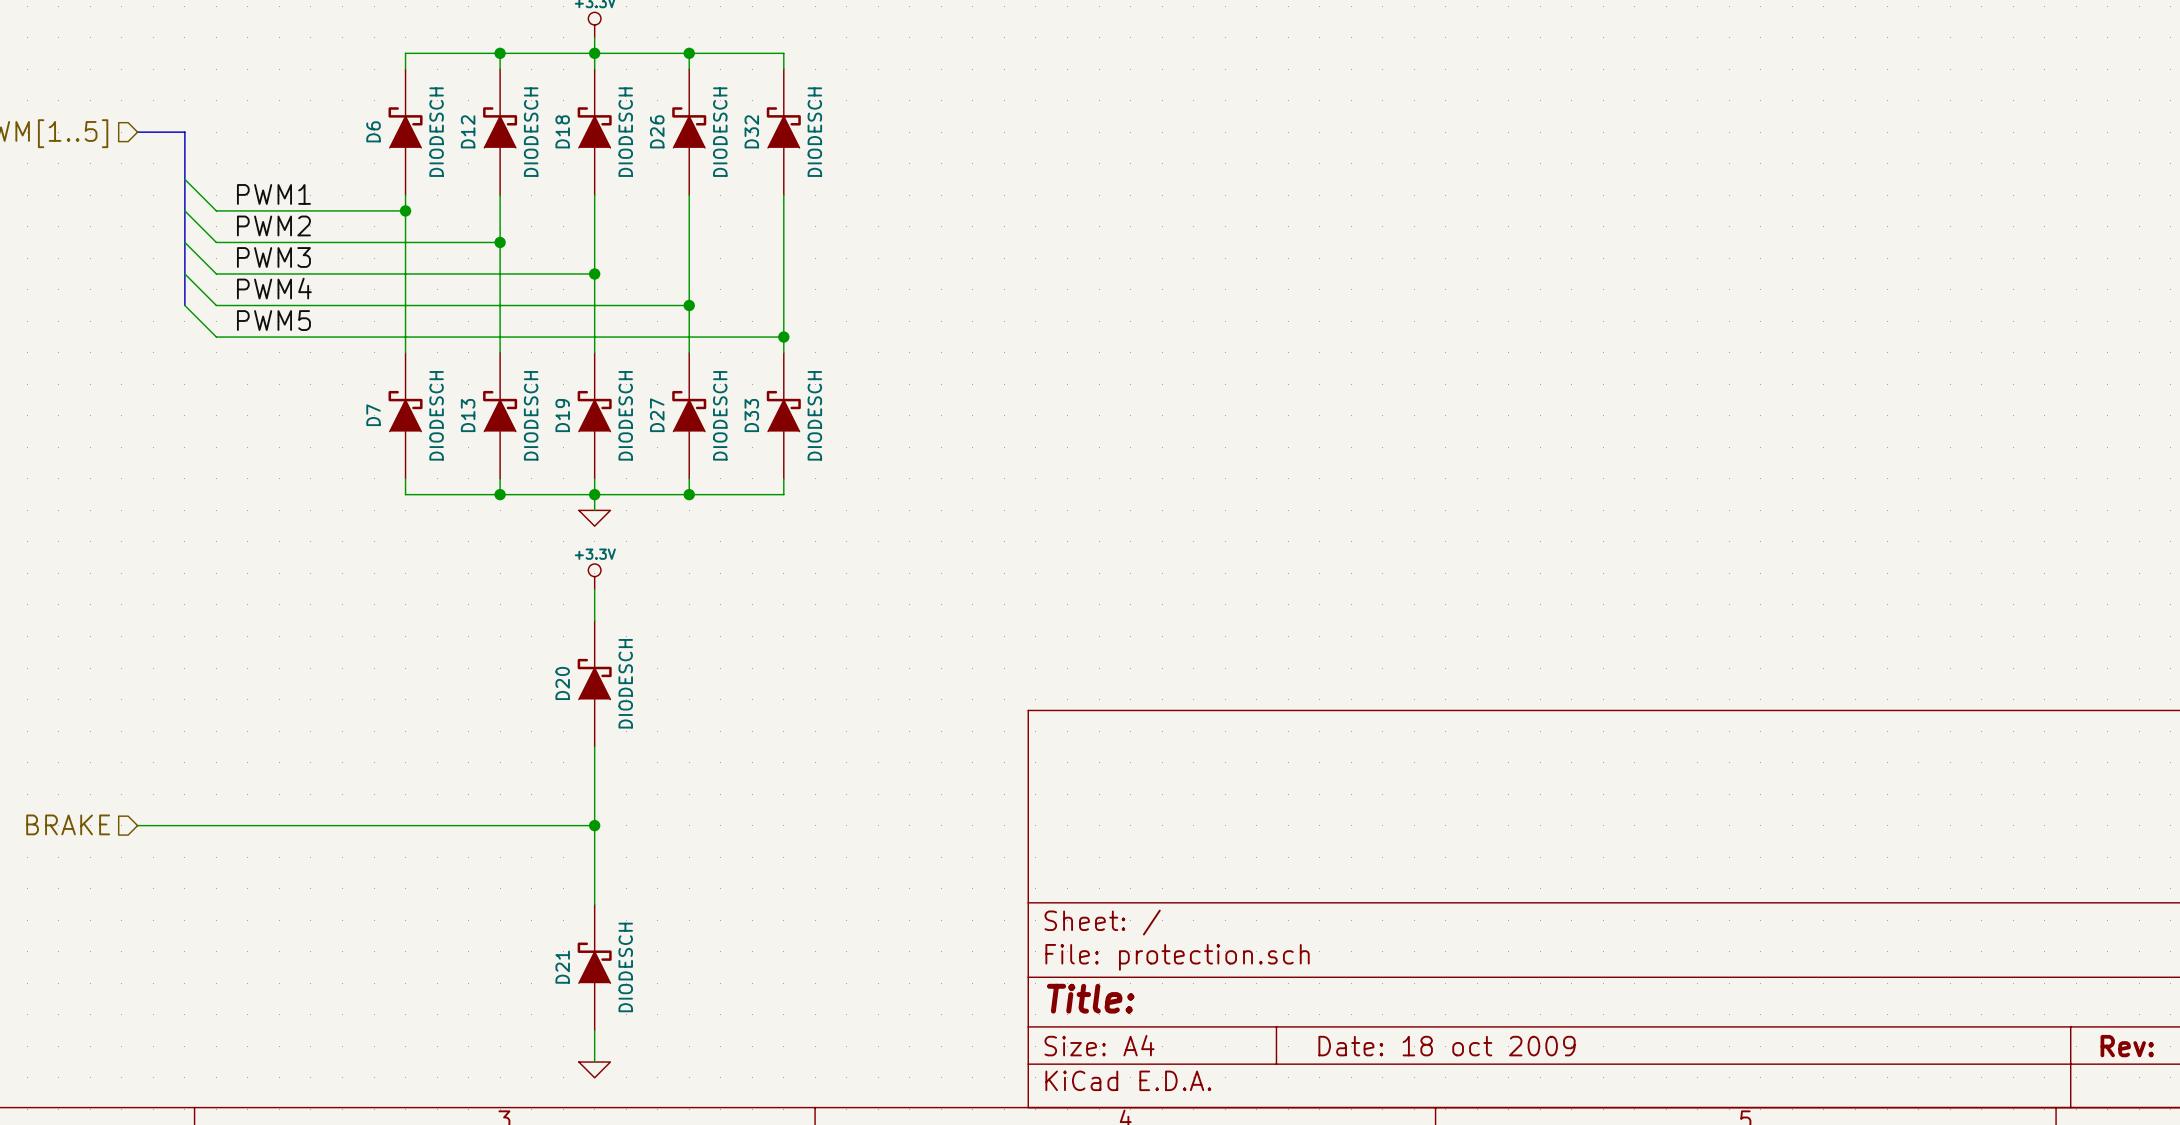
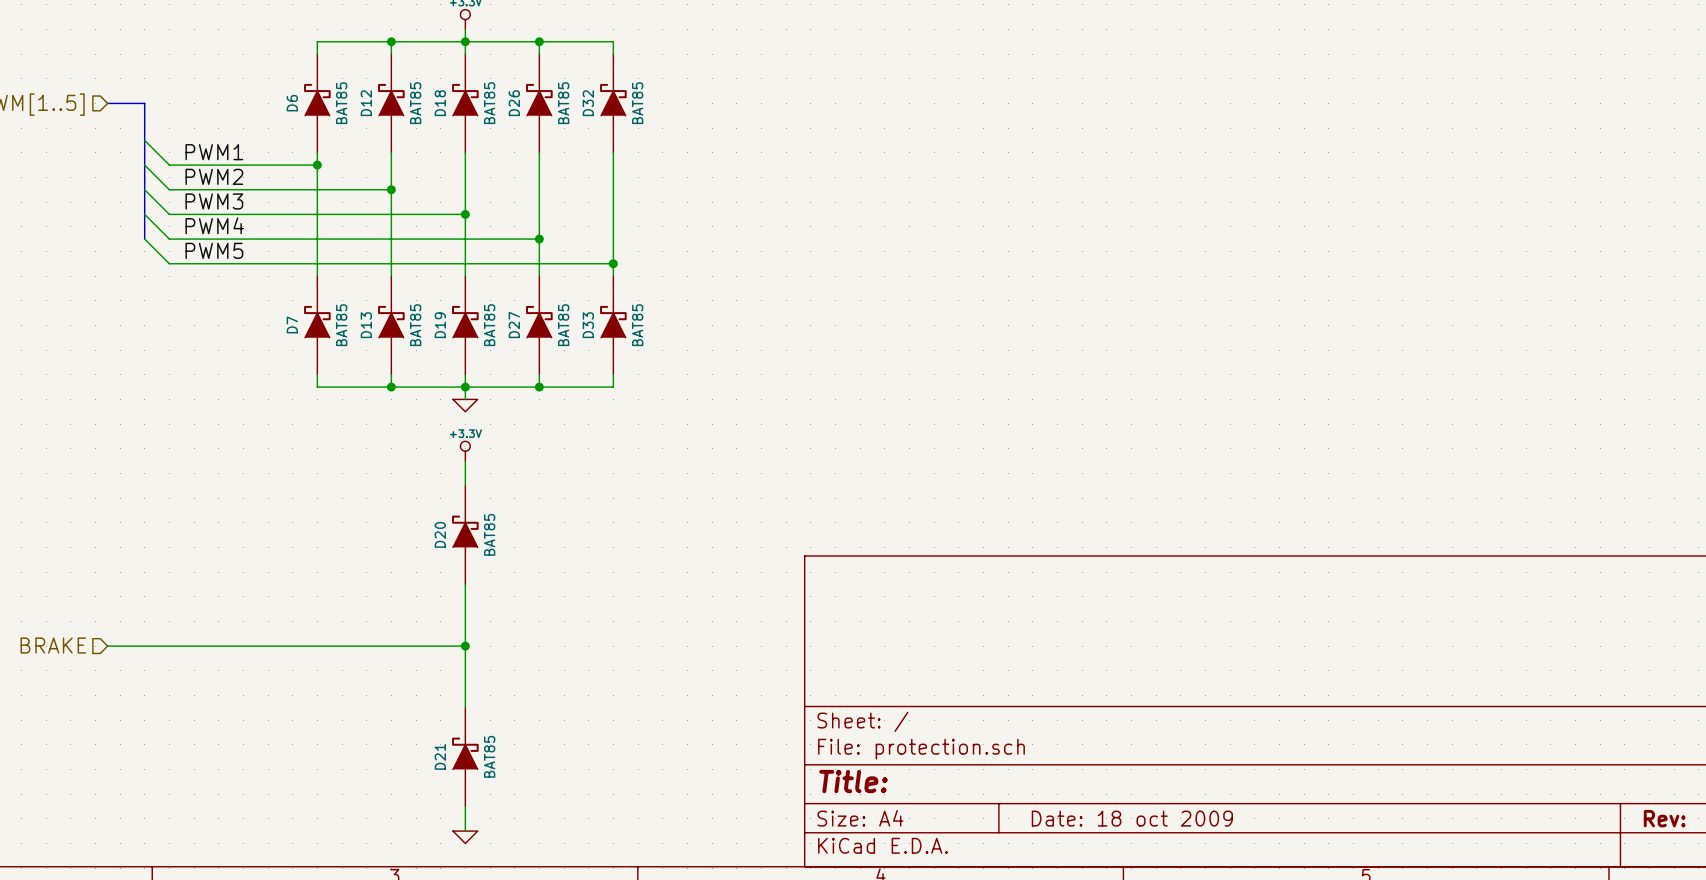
D6 value: DIODESCH (436, 132) -> BAT85 (341, 103)
D12 value: DIODESCH (531, 132) -> BAT85 (415, 103)
D18 value: DIODESCH (625, 132) -> BAT85 (489, 103)
D26 value: DIODESCH (720, 132) -> BAT85 (563, 103)
D32 value: DIODESCH (814, 132) -> BAT85 (637, 103)
D7 value: DIODESCH (436, 415) -> BAT85 (341, 325)
D13 value: DIODESCH (531, 415) -> BAT85 (415, 325)
D19 value: DIODESCH (625, 415) -> BAT85 (489, 325)
D27 value: DIODESCH (720, 415) -> BAT85 (563, 325)
D33 value: DIODESCH (814, 415) -> BAT85 (637, 325)
D20 value: DIODESCH (625, 683) -> BAT85 (489, 534)
D21 value: DIODESCH (625, 967) -> BAT85 (489, 756)

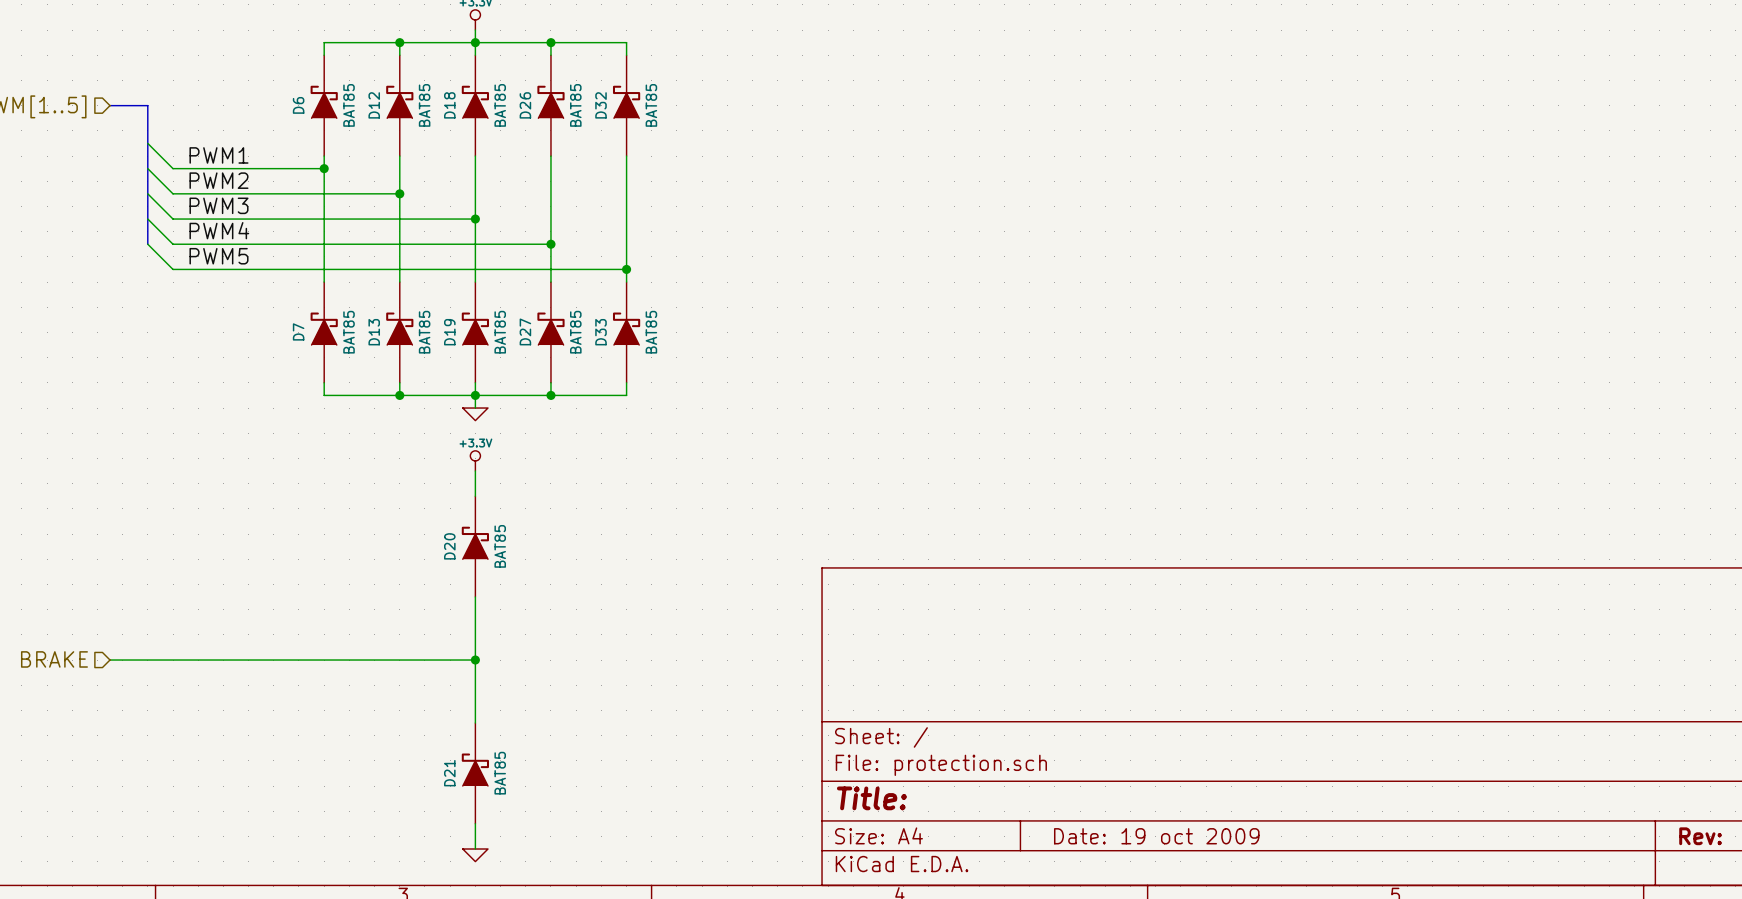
title block: Date: 18 oct 2009 (1132, 818) -> Date: 19 oct 2009 (1156, 836)

